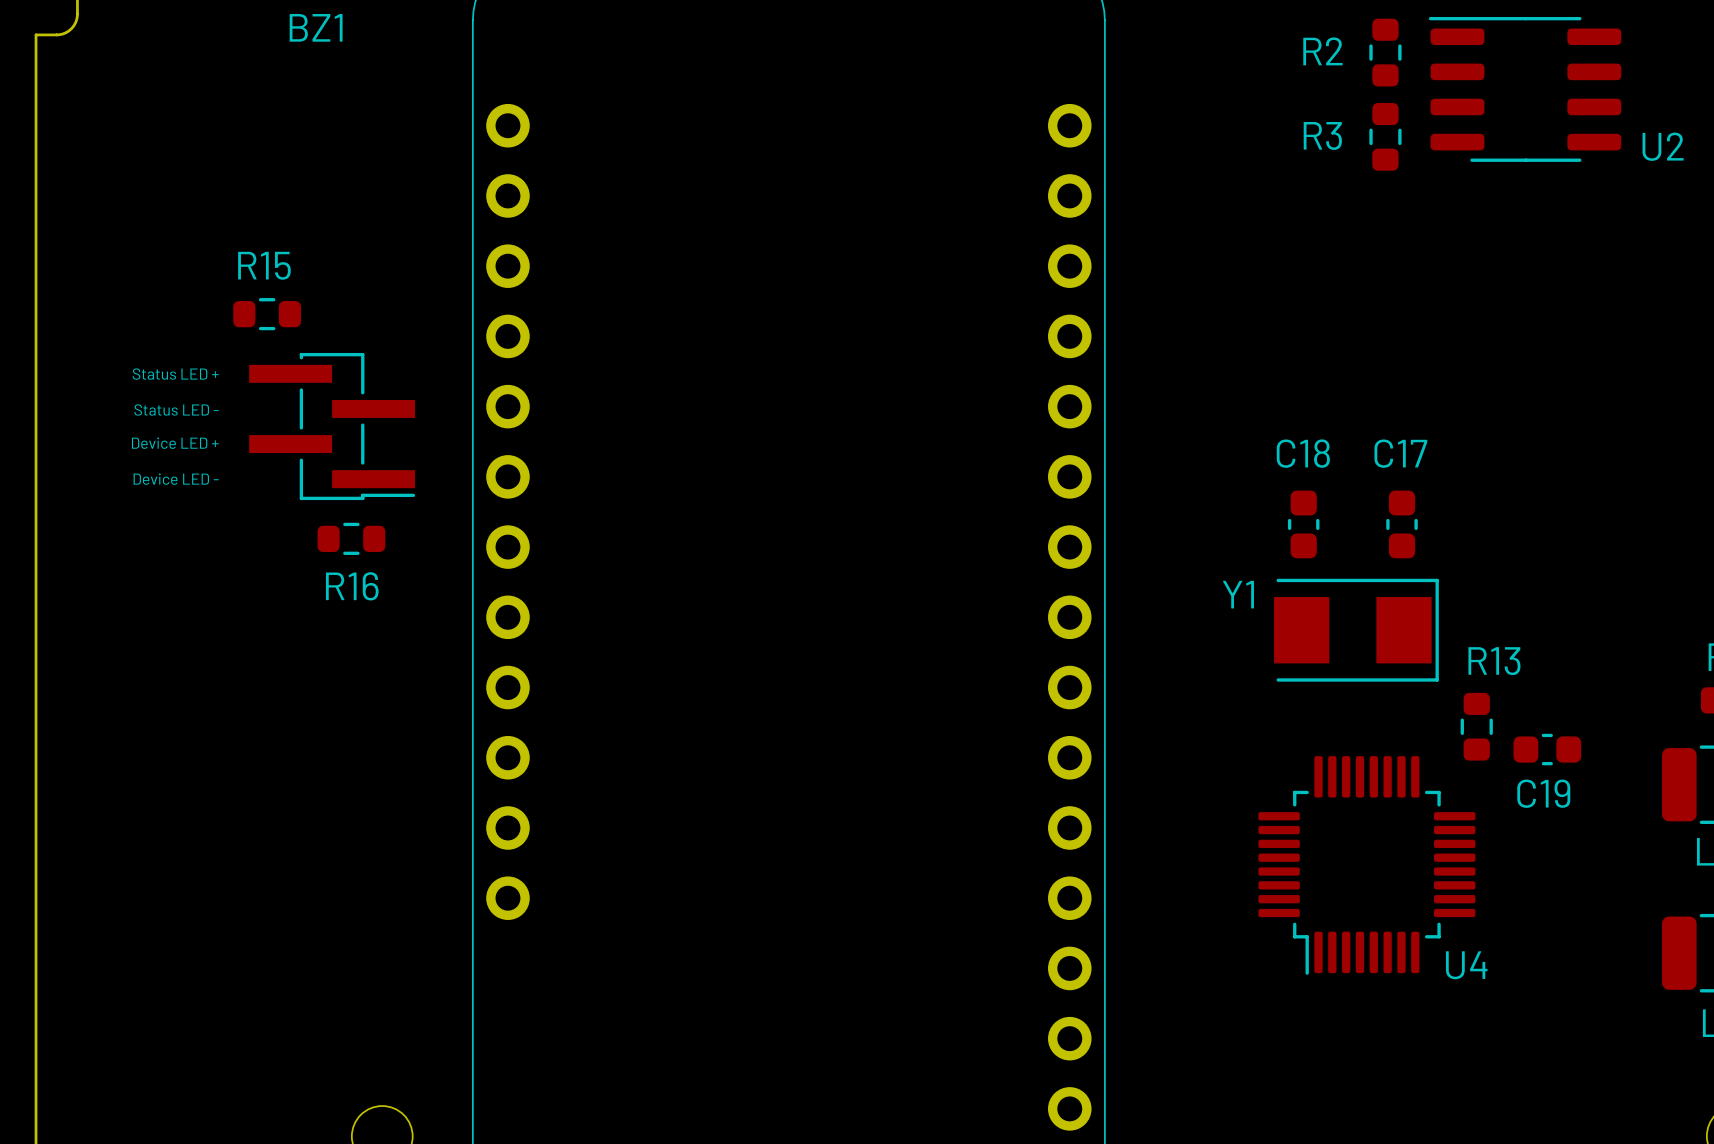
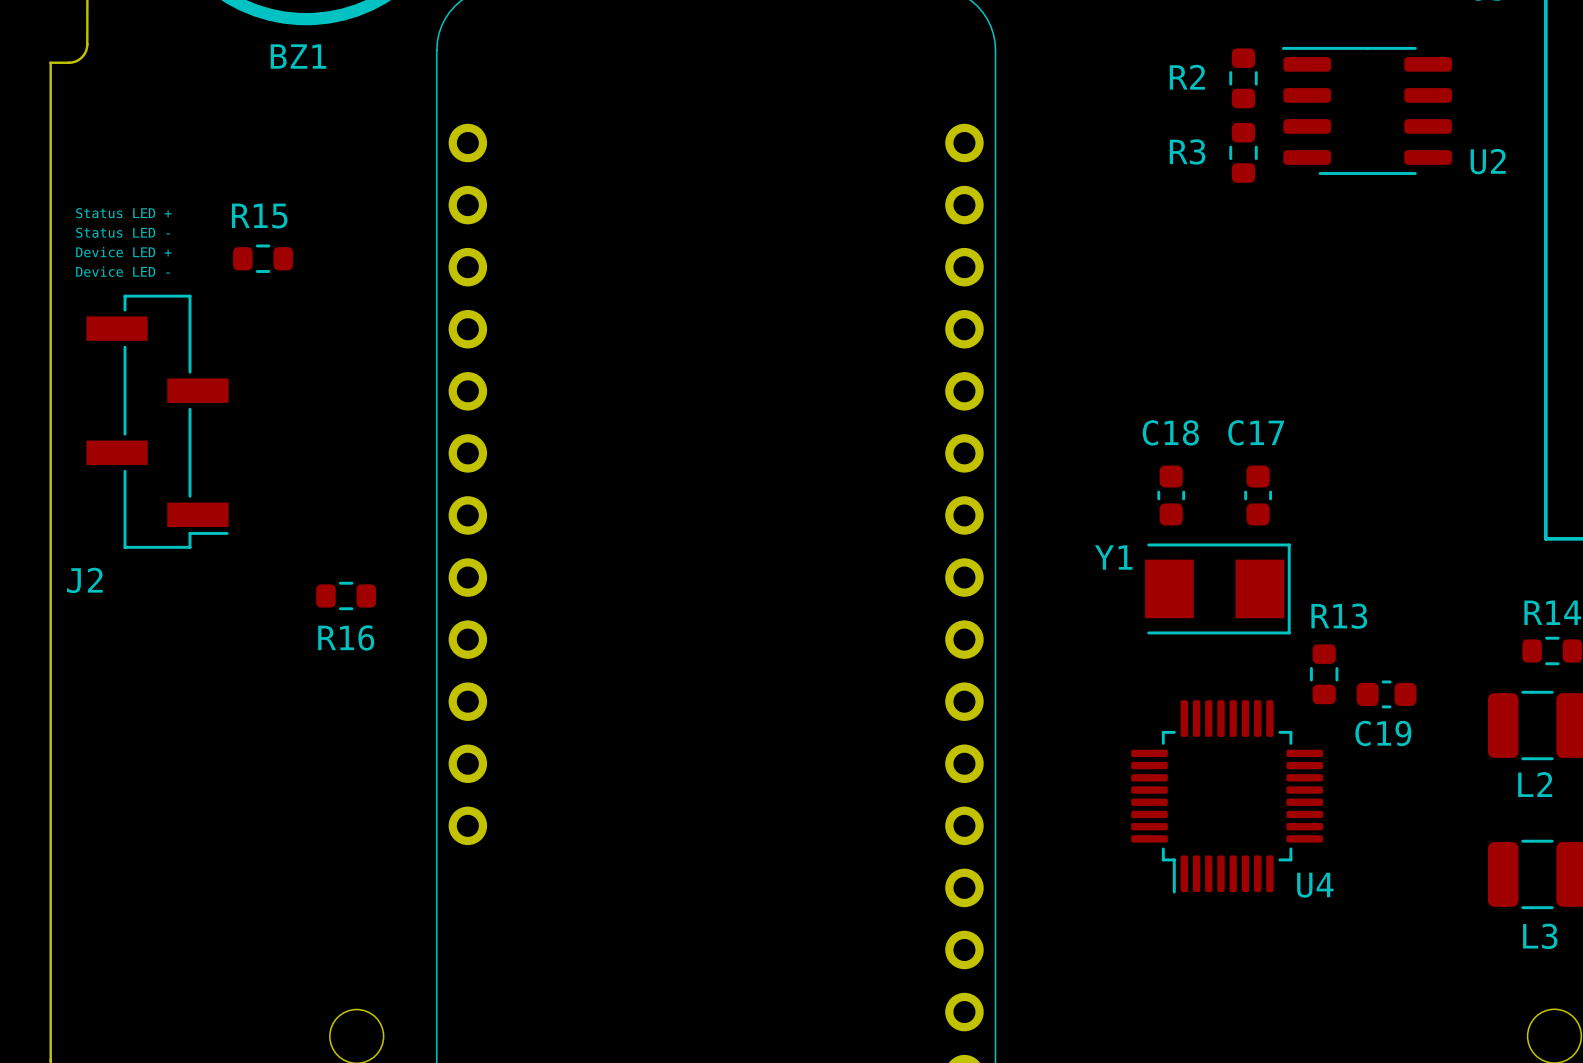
R15 position: (267, 314) -> (263, 258)
text position: Status LED + (175, 374) -> Status LED + (123, 213)
text position: Status LED - (176, 410) -> Status LED - (123, 232)
part: (332, 426) -> none
J2: none -> (157, 421)
text position: Device LED + (175, 443) -> Device LED + (123, 252)
text position: Device LED - (176, 479) -> Device LED - (123, 271)
R16 position: (351, 538) -> (346, 595)

